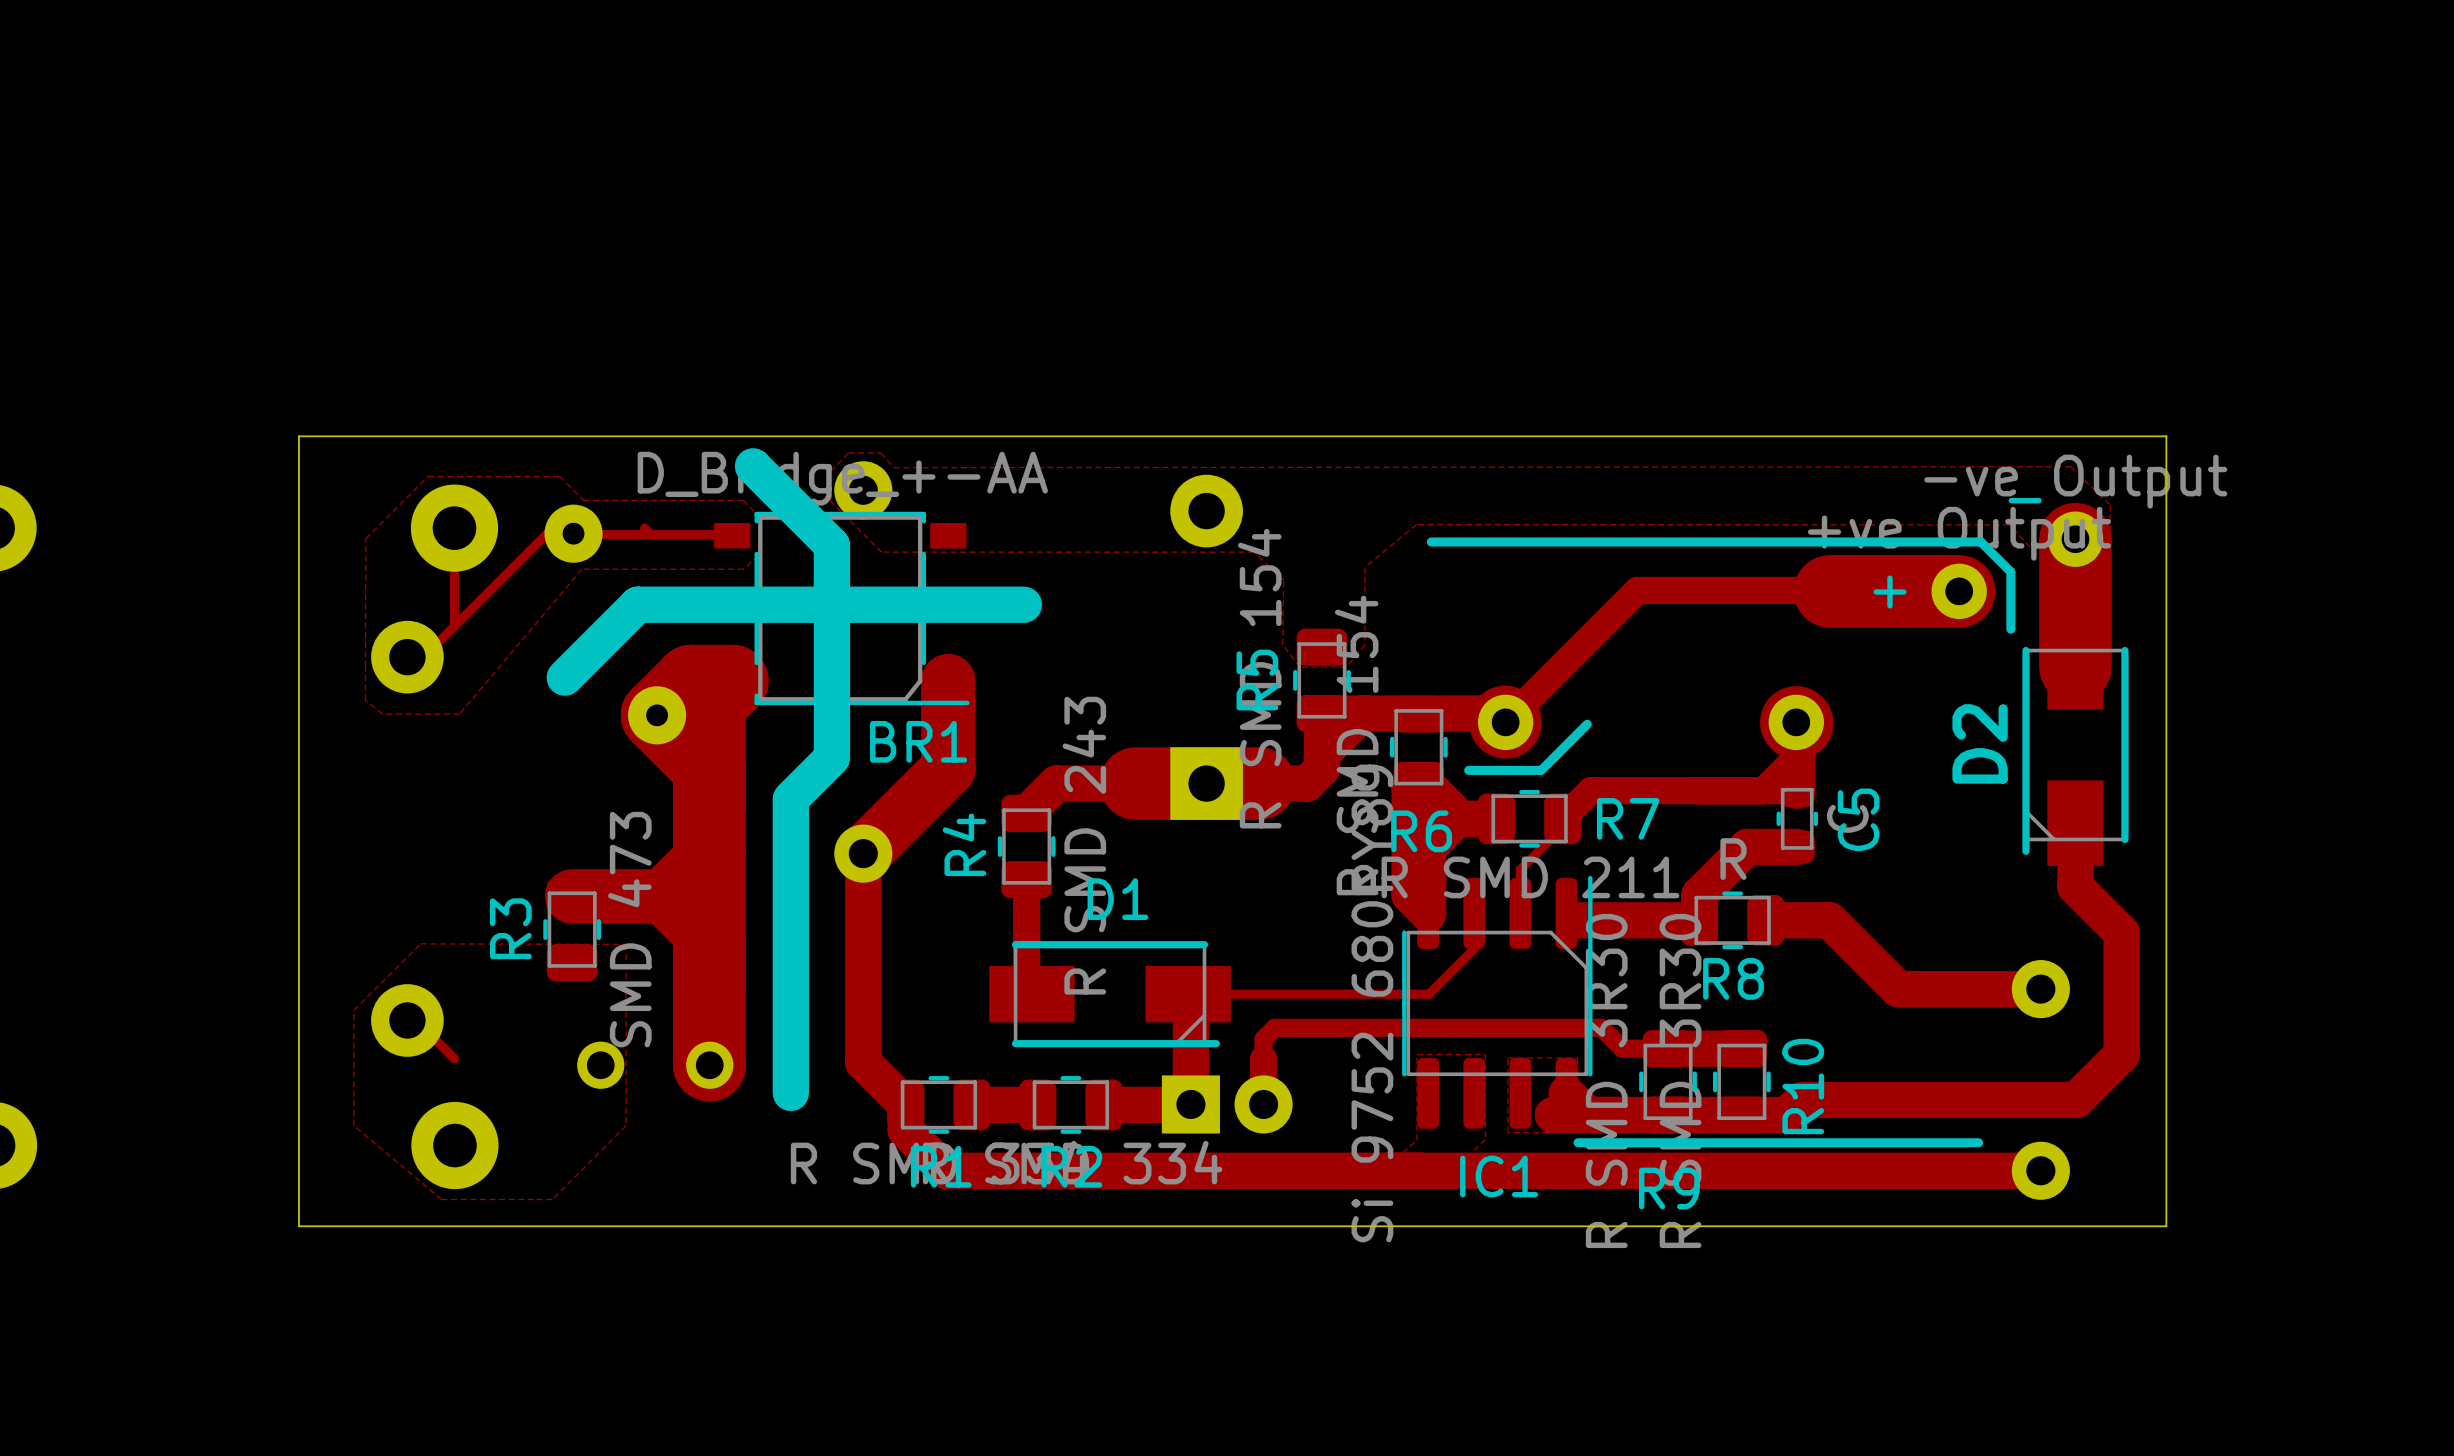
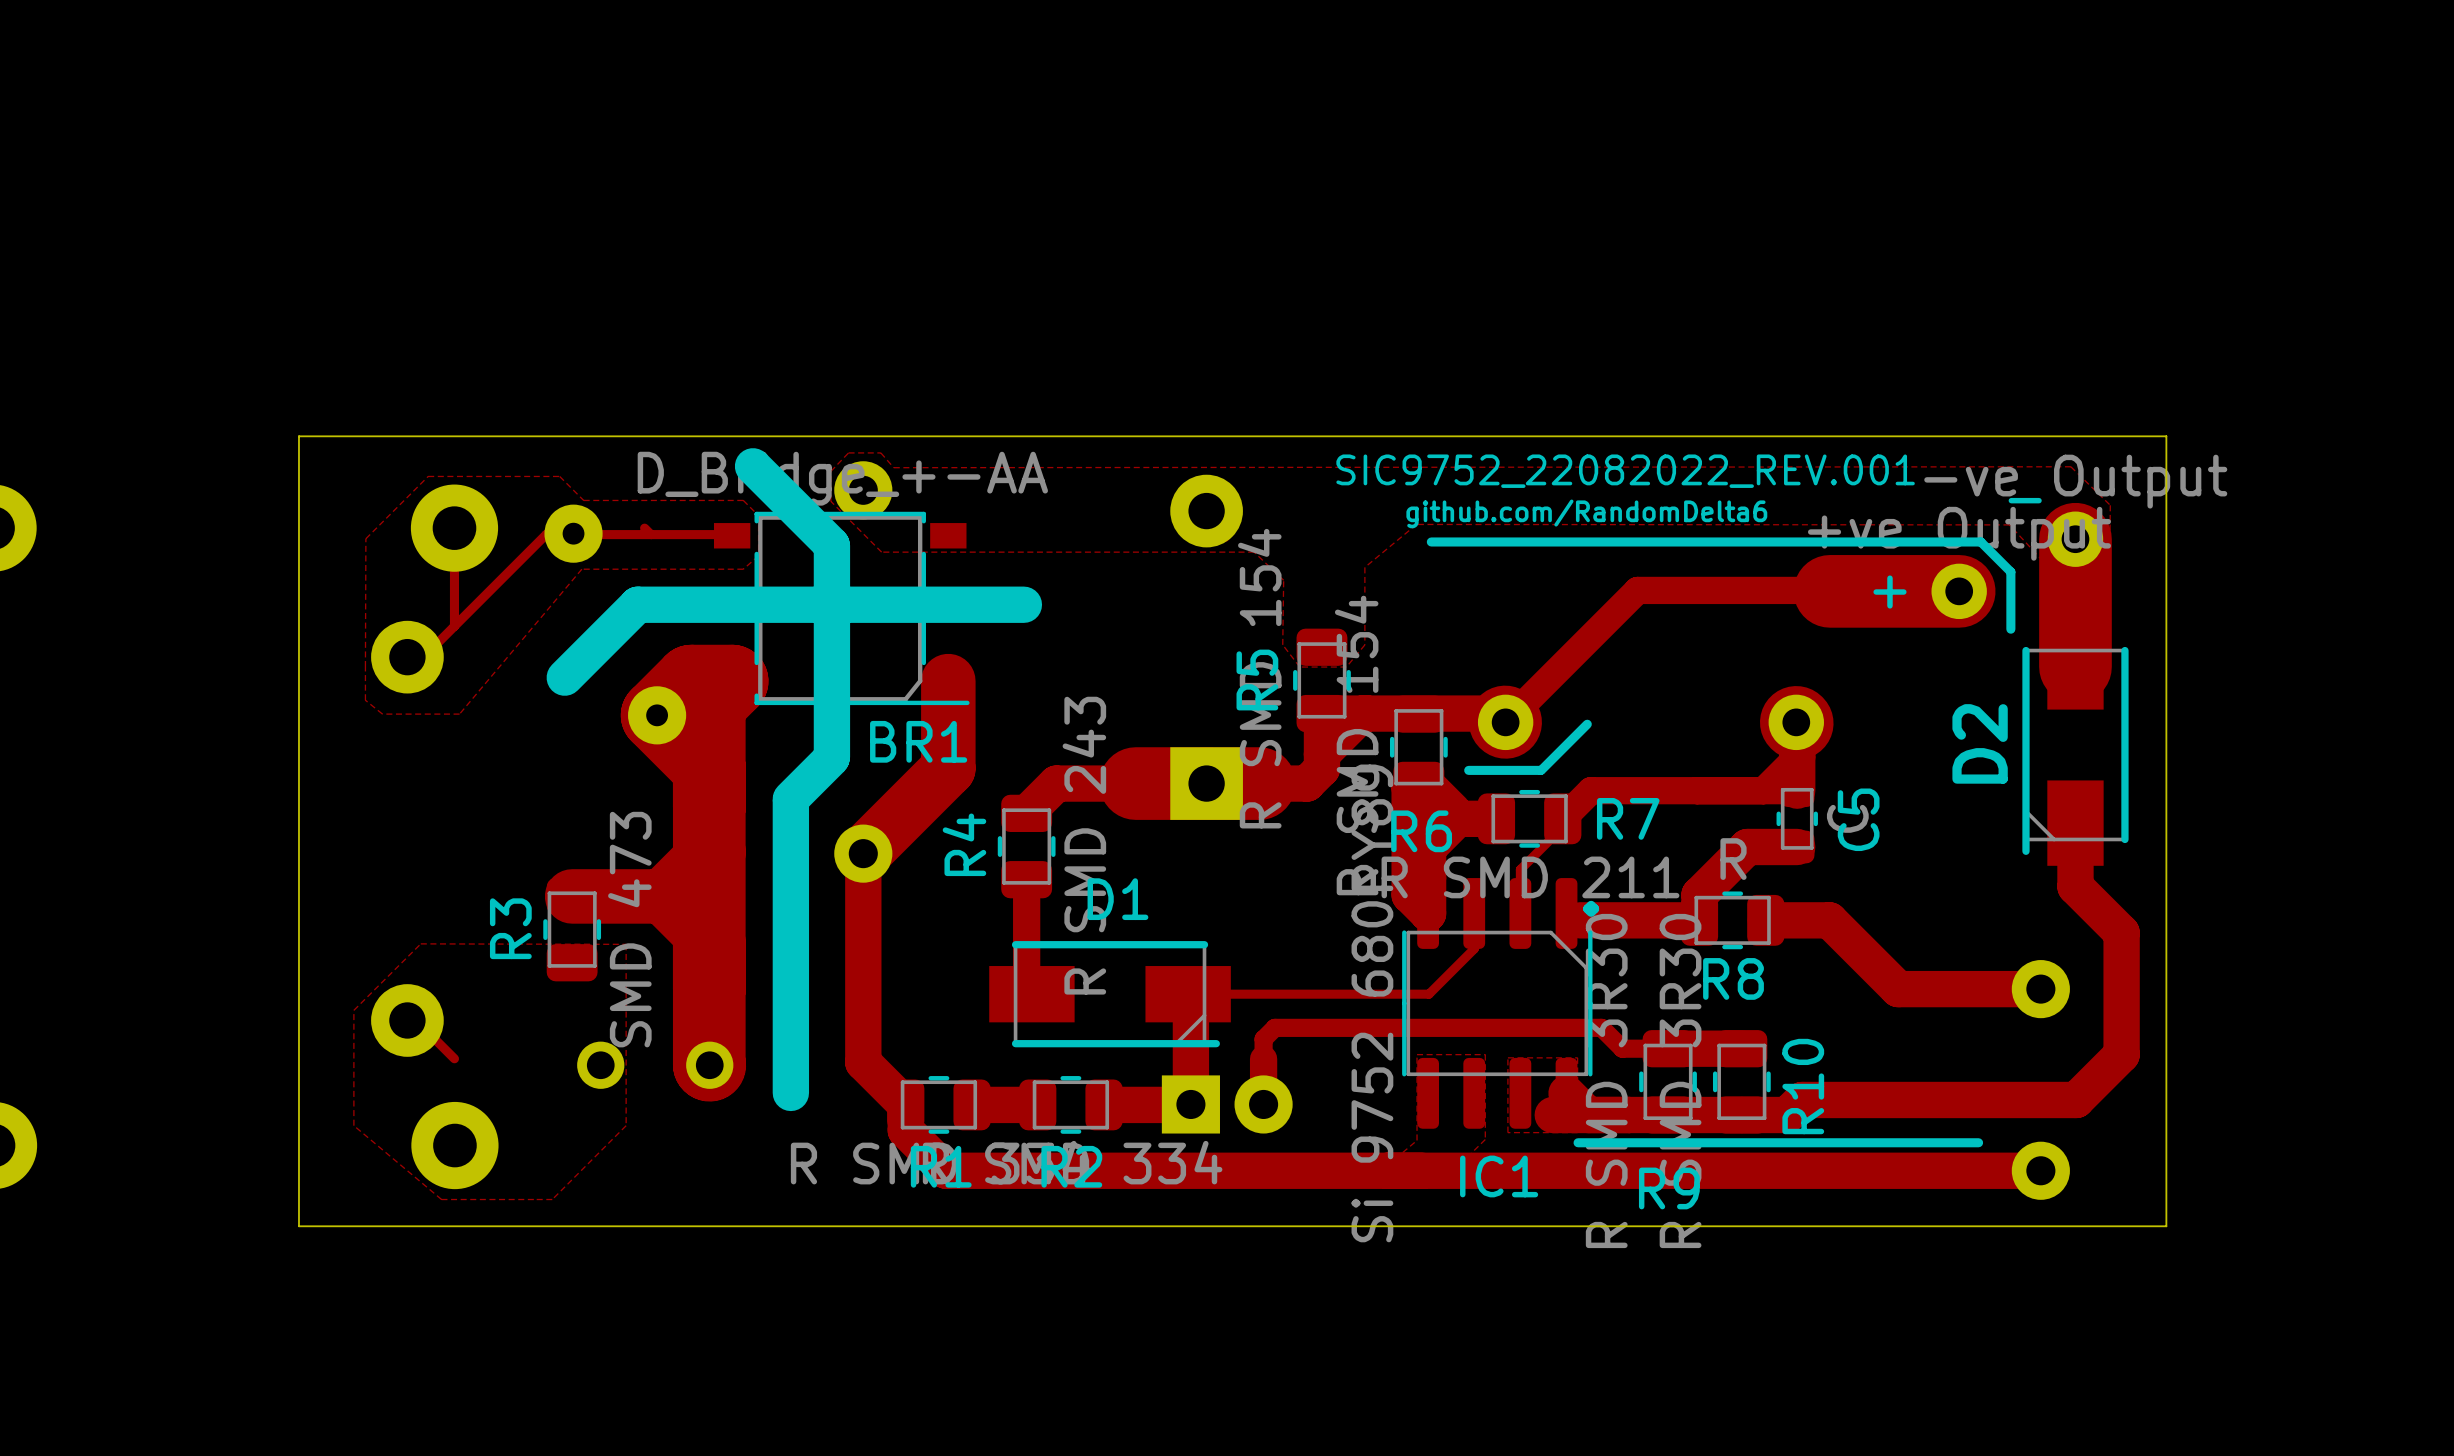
text: none -> SIC9752_22082022_REV.001 (1625, 471)
text: none -> github.com/RandomDelta6 (1586, 513)
IC1 footprint: [1402, 875, 1593, 1129] -> [1402, 878, 1593, 1129]

